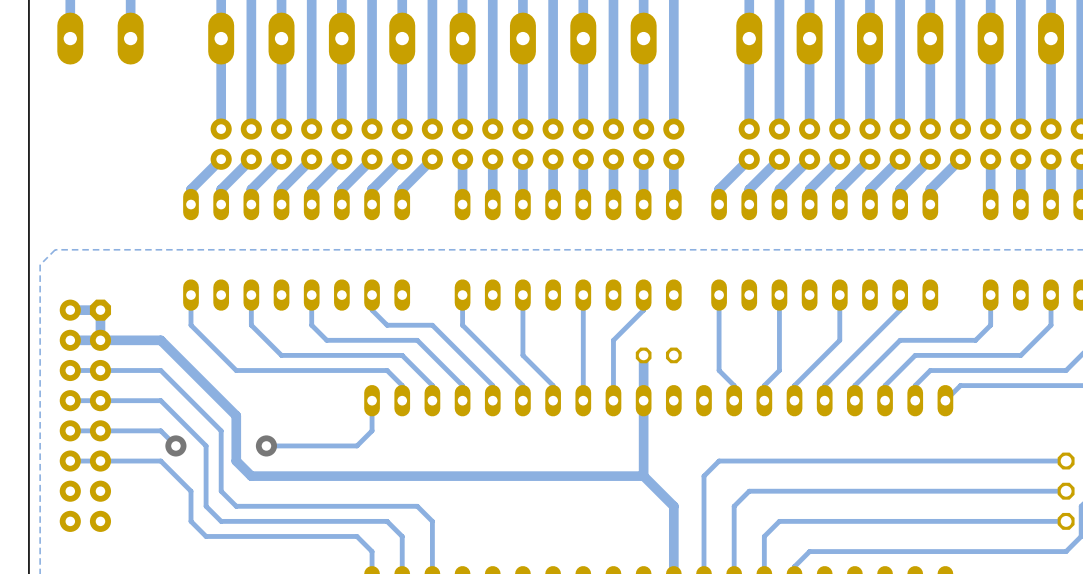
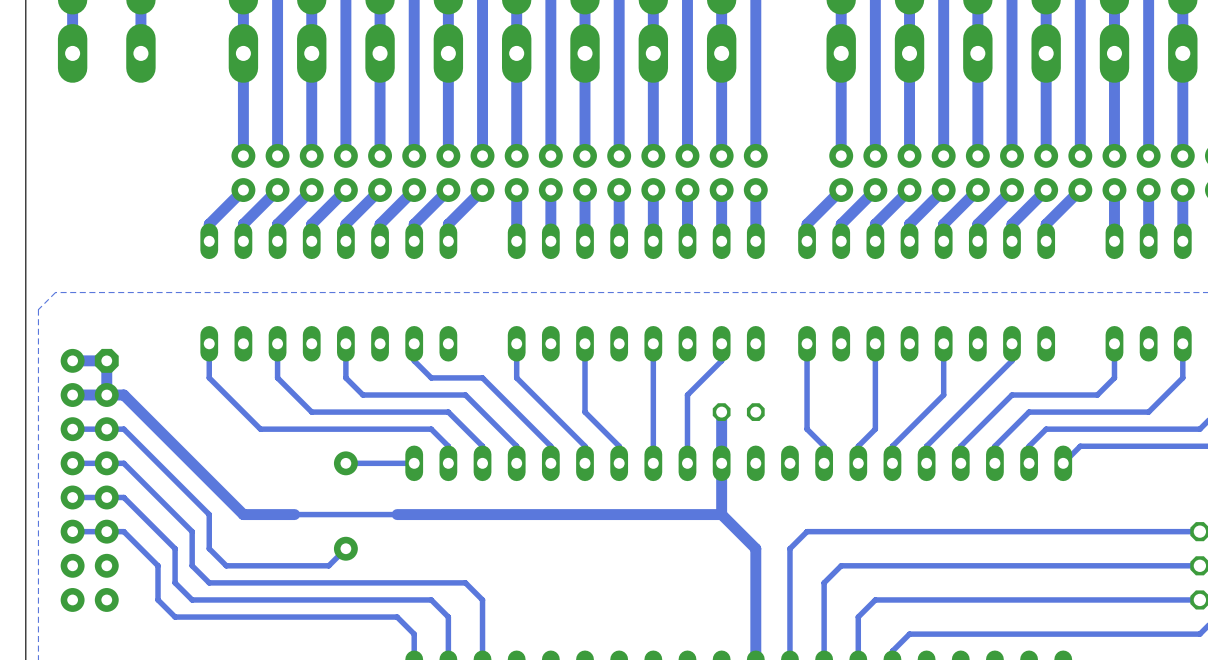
track: (115, 340) (160, 340) (236, 415) (236, 461) (251, 476) (643, 476) -> (123, 395) (243, 514) (294, 514)
track: (115, 370) (160, 370) (221, 430) (221, 491) (236, 506) -> (123, 429) (209, 514) (209, 548) (226, 565) (328, 565) (345, 548)
track: (115, 400) (160, 400) (206, 445) (206, 506) (221, 521) -> (123, 463) (192, 531) (192, 565) (209, 582) (260, 582)
via: none -> (345, 463)
track: (372, 400) (372, 430) (356, 445) -> (414, 463) (345, 463)
track: (115, 430) (160, 430) (175, 445) -> (123, 497) (175, 548) (175, 582) (192, 599) (243, 599)
via: (175, 445) -> none
via: (266, 445) -> none
track: (643, 445) (643, 476) -> none
track: (115, 461) (160, 461) (191, 491) (191, 521) (206, 536) -> (123, 531) (158, 565) (158, 599) (175, 617) (226, 617)
via: none -> (345, 548)
track: (643, 476) (673, 506) -> (397, 514) (721, 514) (755, 548) (755, 582)

